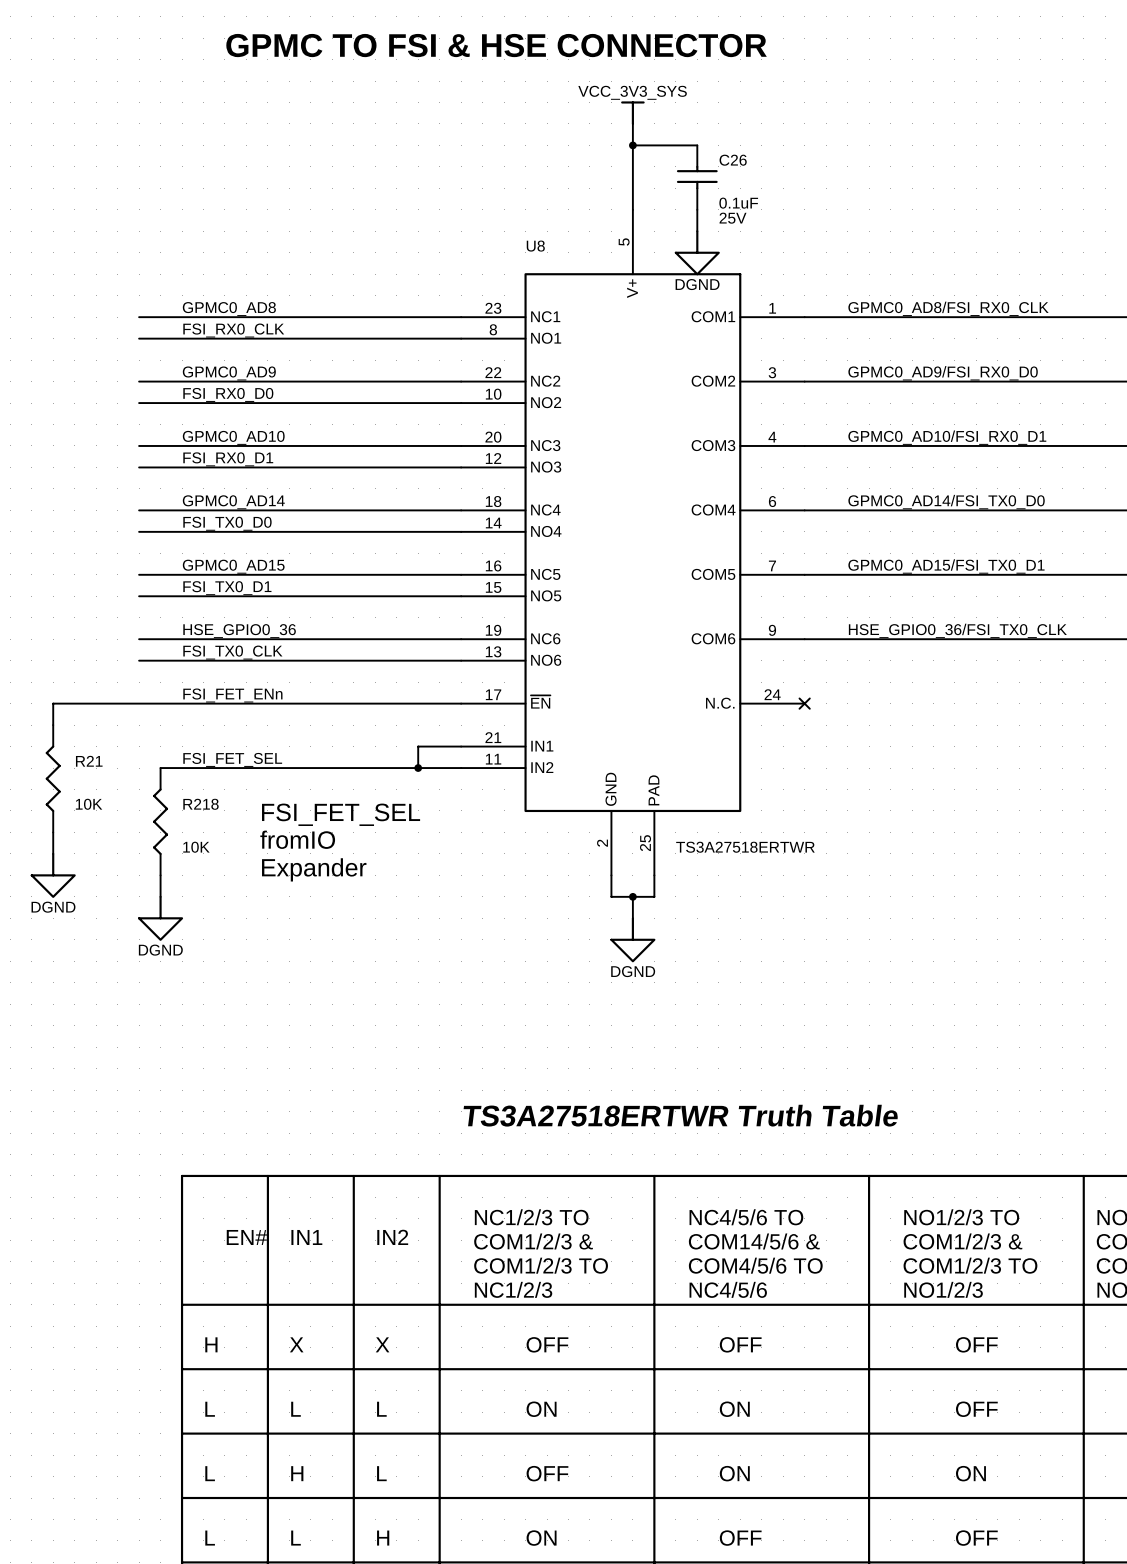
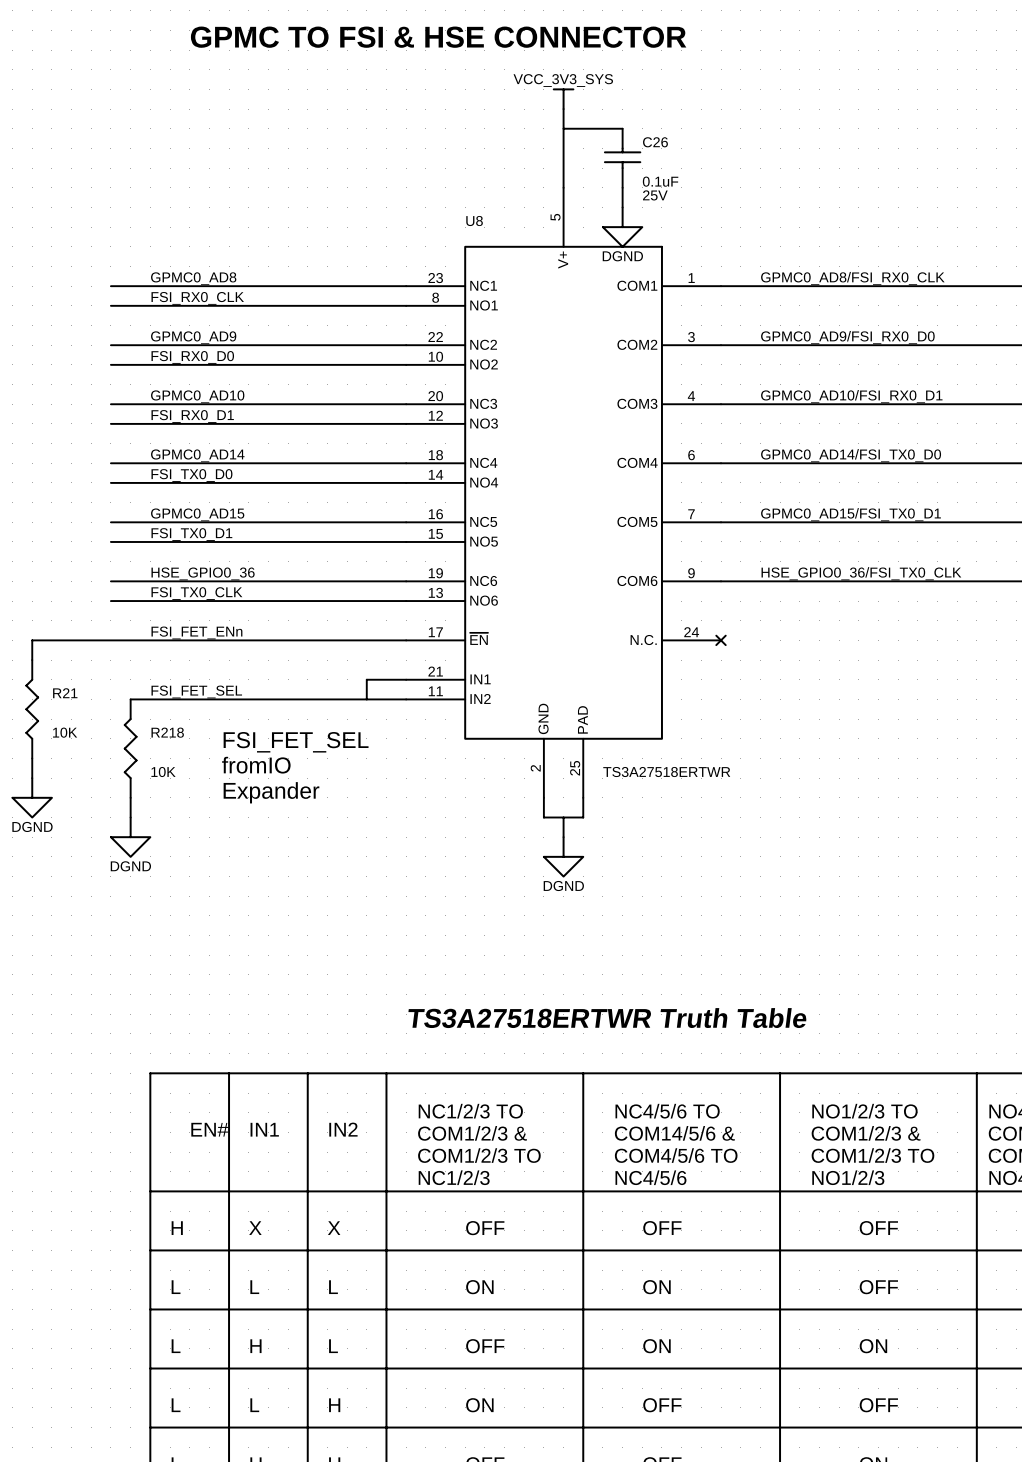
junction: (632, 145) -> none
junction: (418, 768) -> none
junction: (632, 896) -> none

